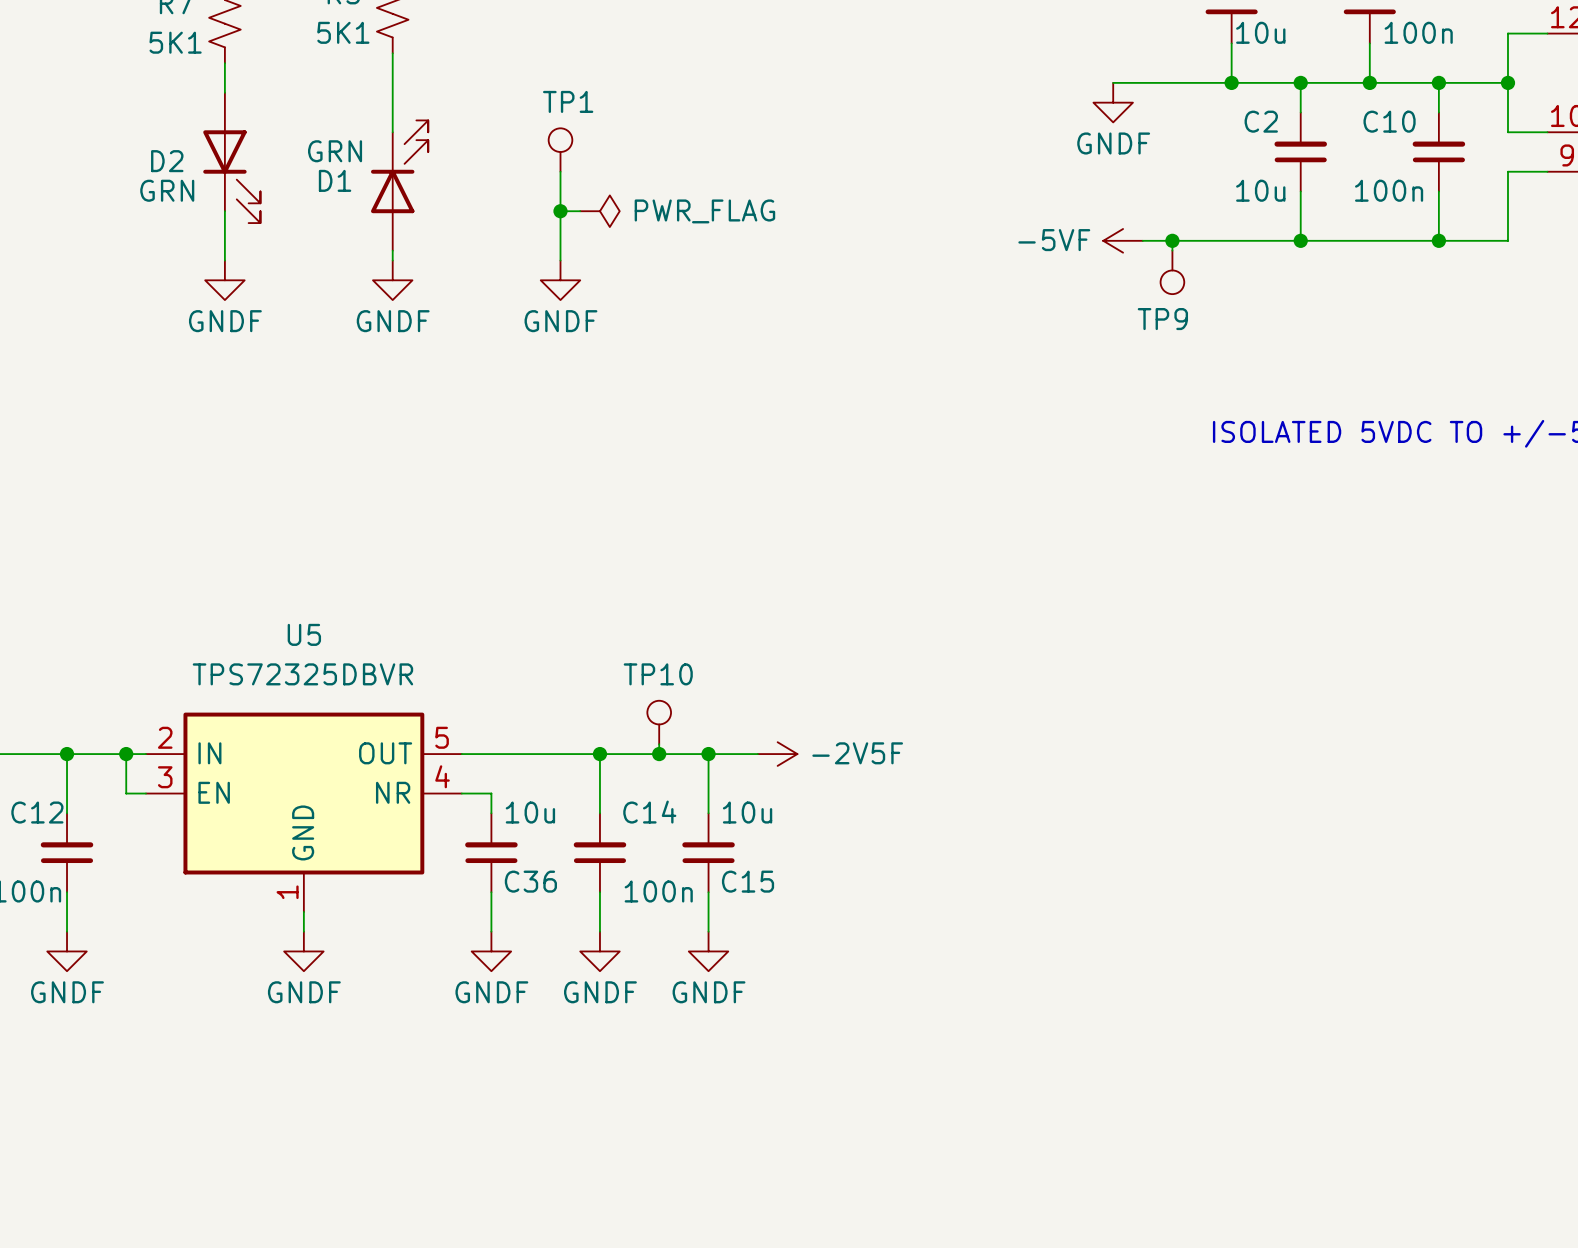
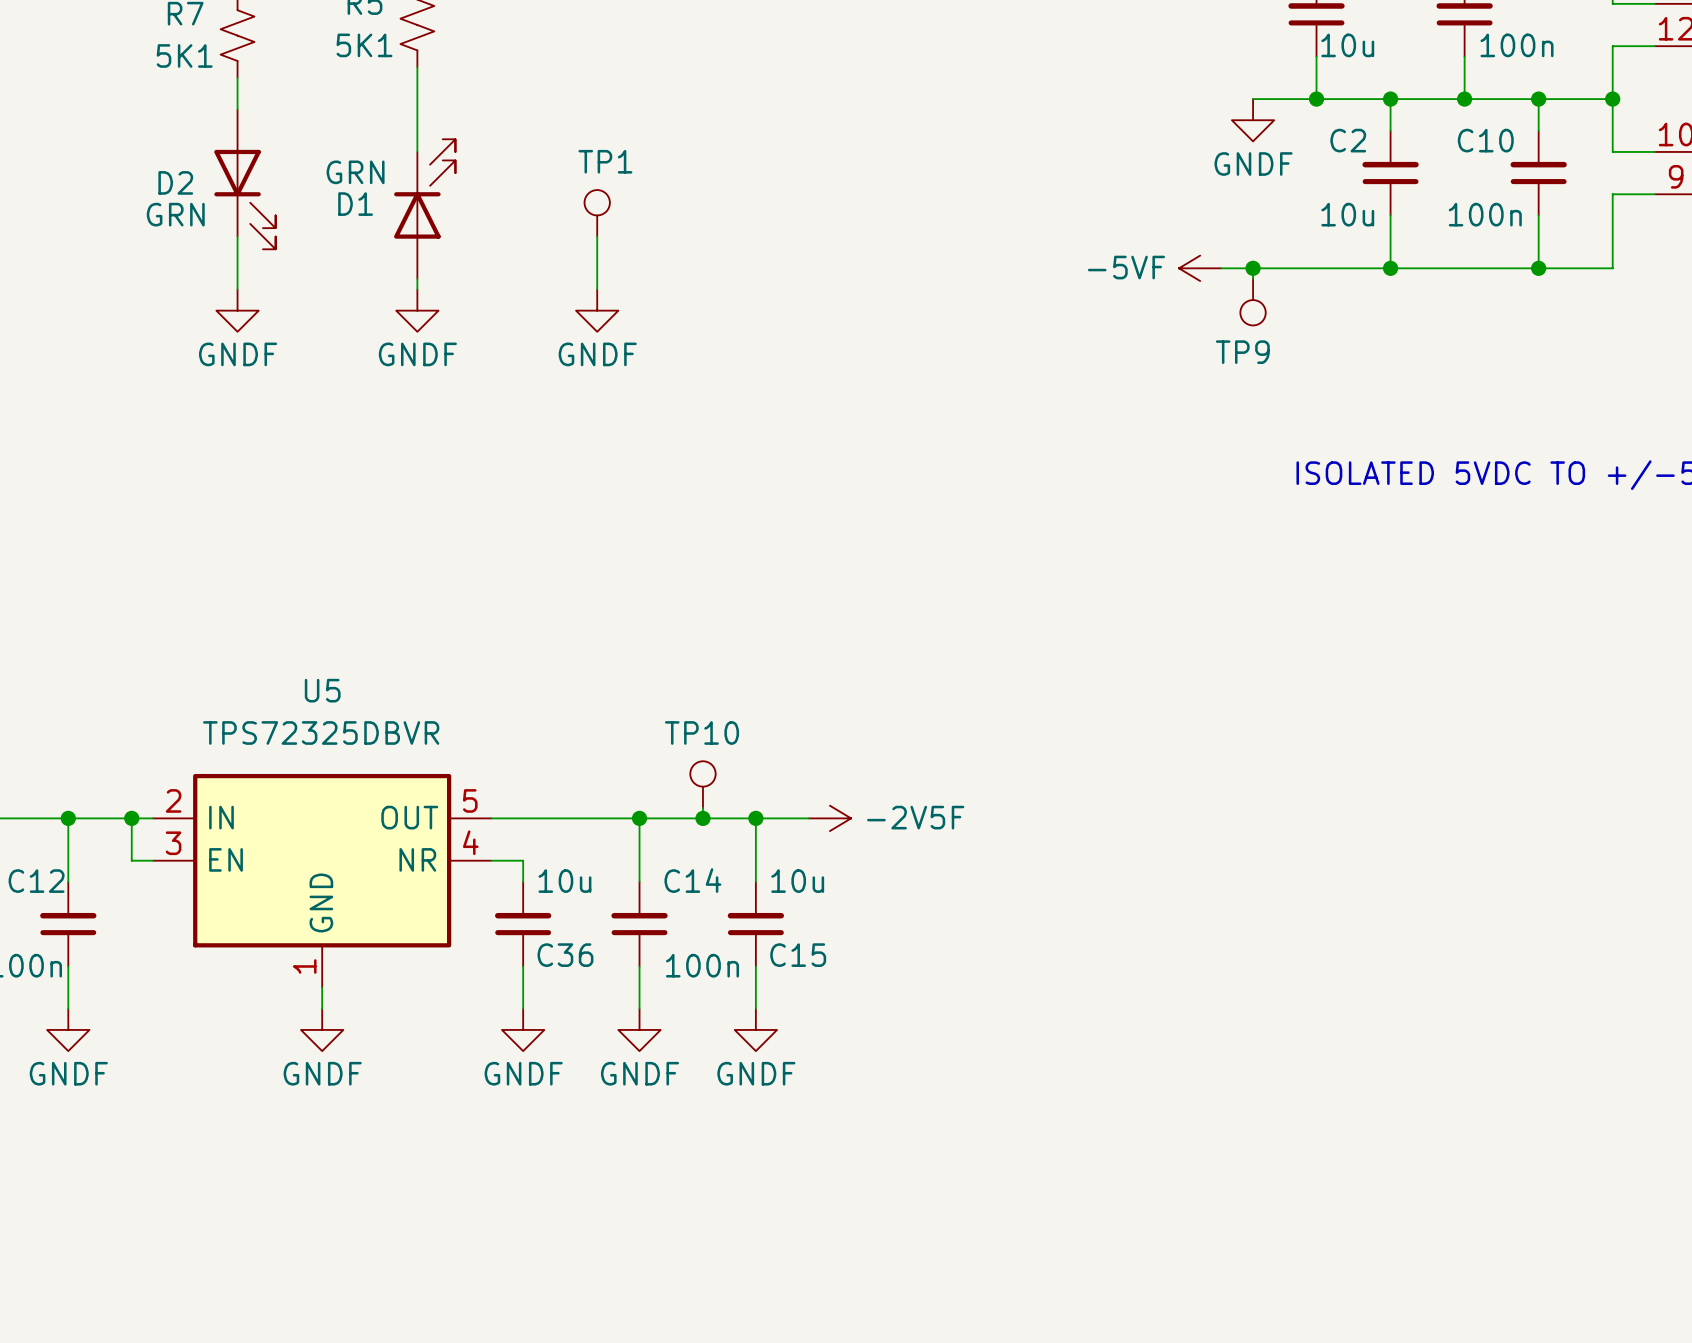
wire: (1113, 82) (1172, 82) -> none
power symbol position: GNDF (1113, 102) -> GNDF (1253, 120)
TP1 position: (560, 150) -> (597, 213)
wire: (560, 171) (560, 211) (580, 211) -> none
junction: (560, 211) -> none
power symbol: PWR_FLAG (599, 211) -> none

